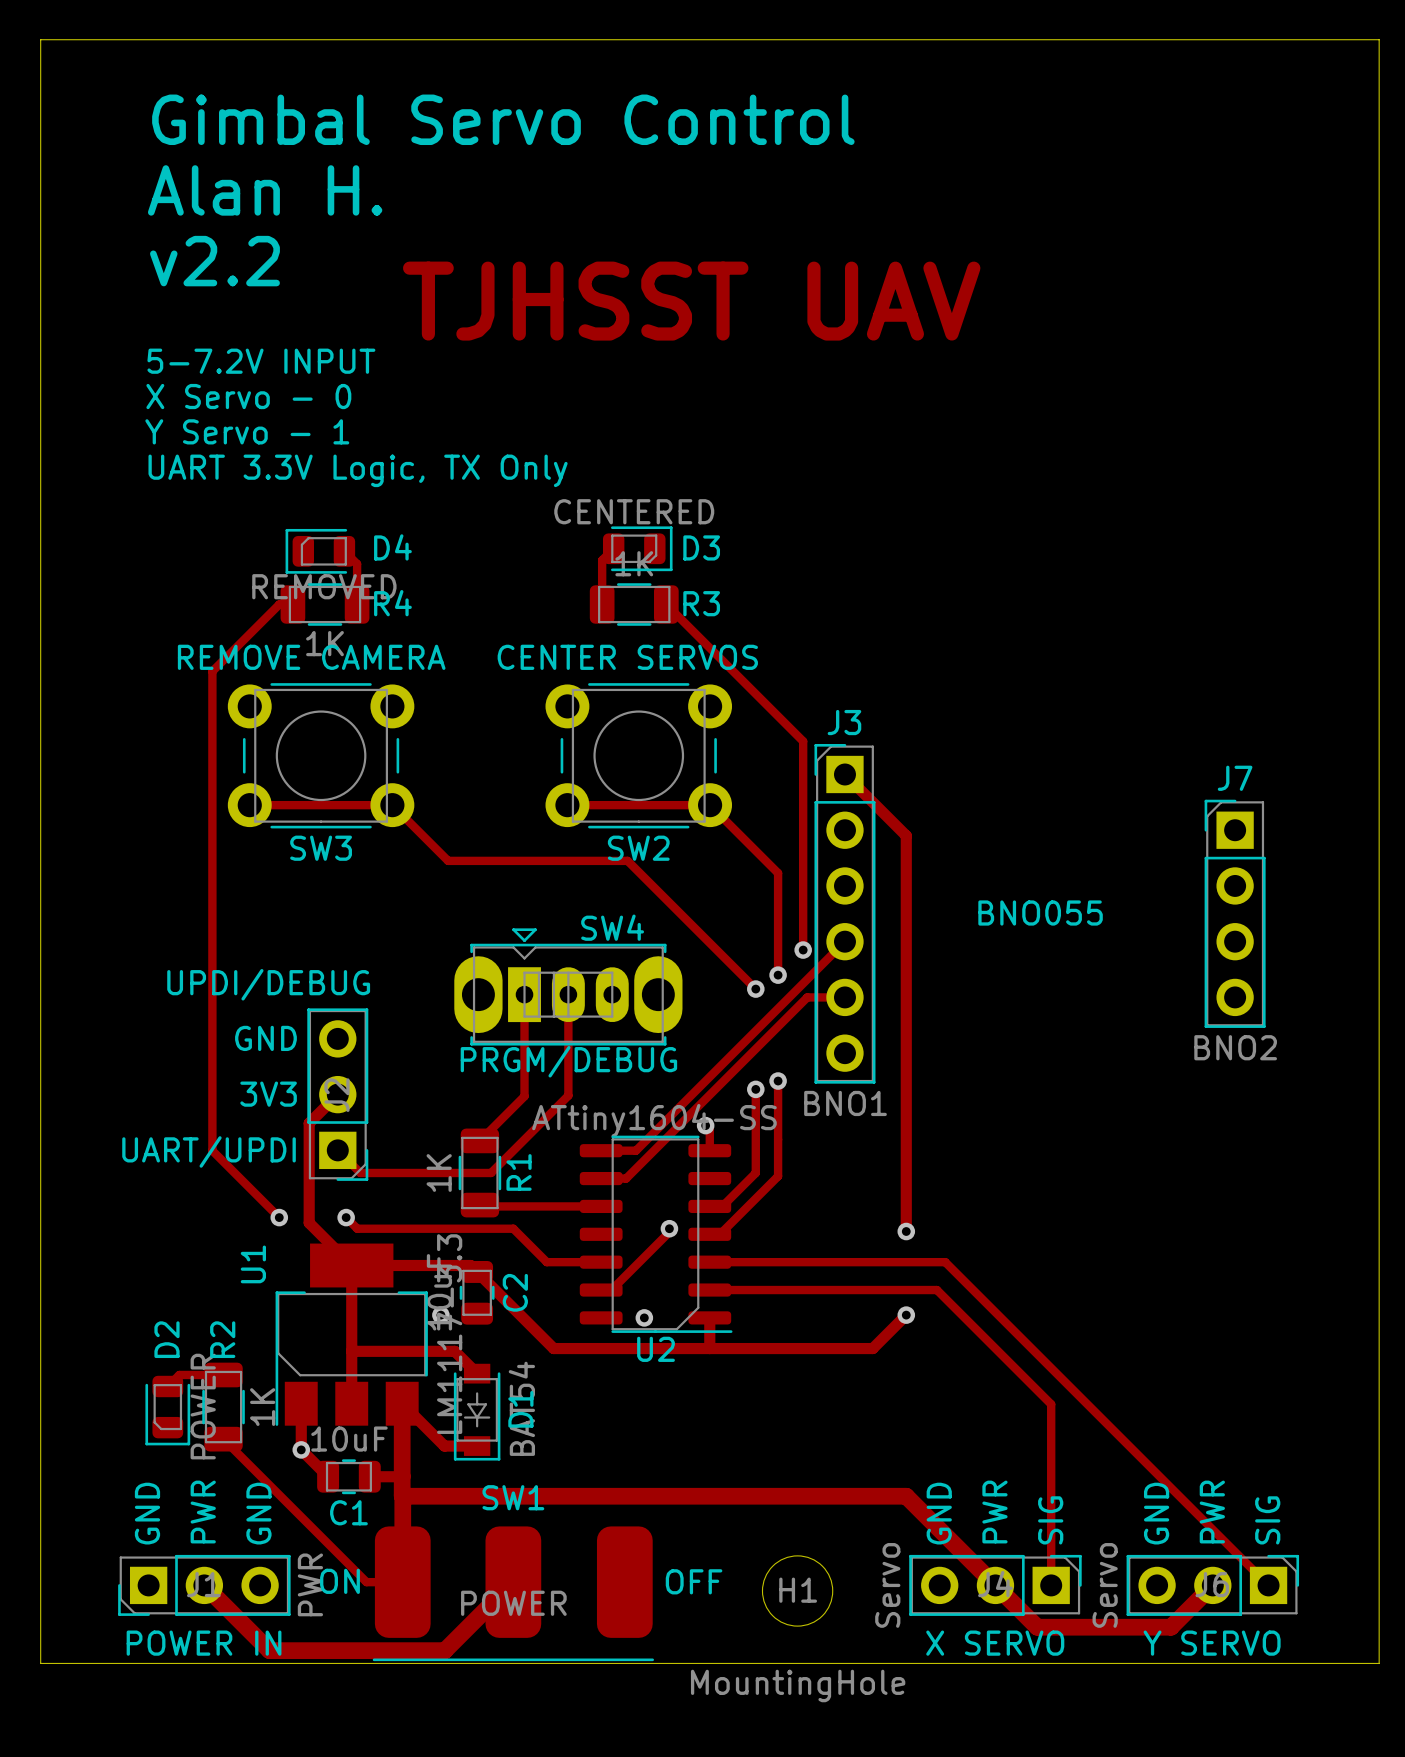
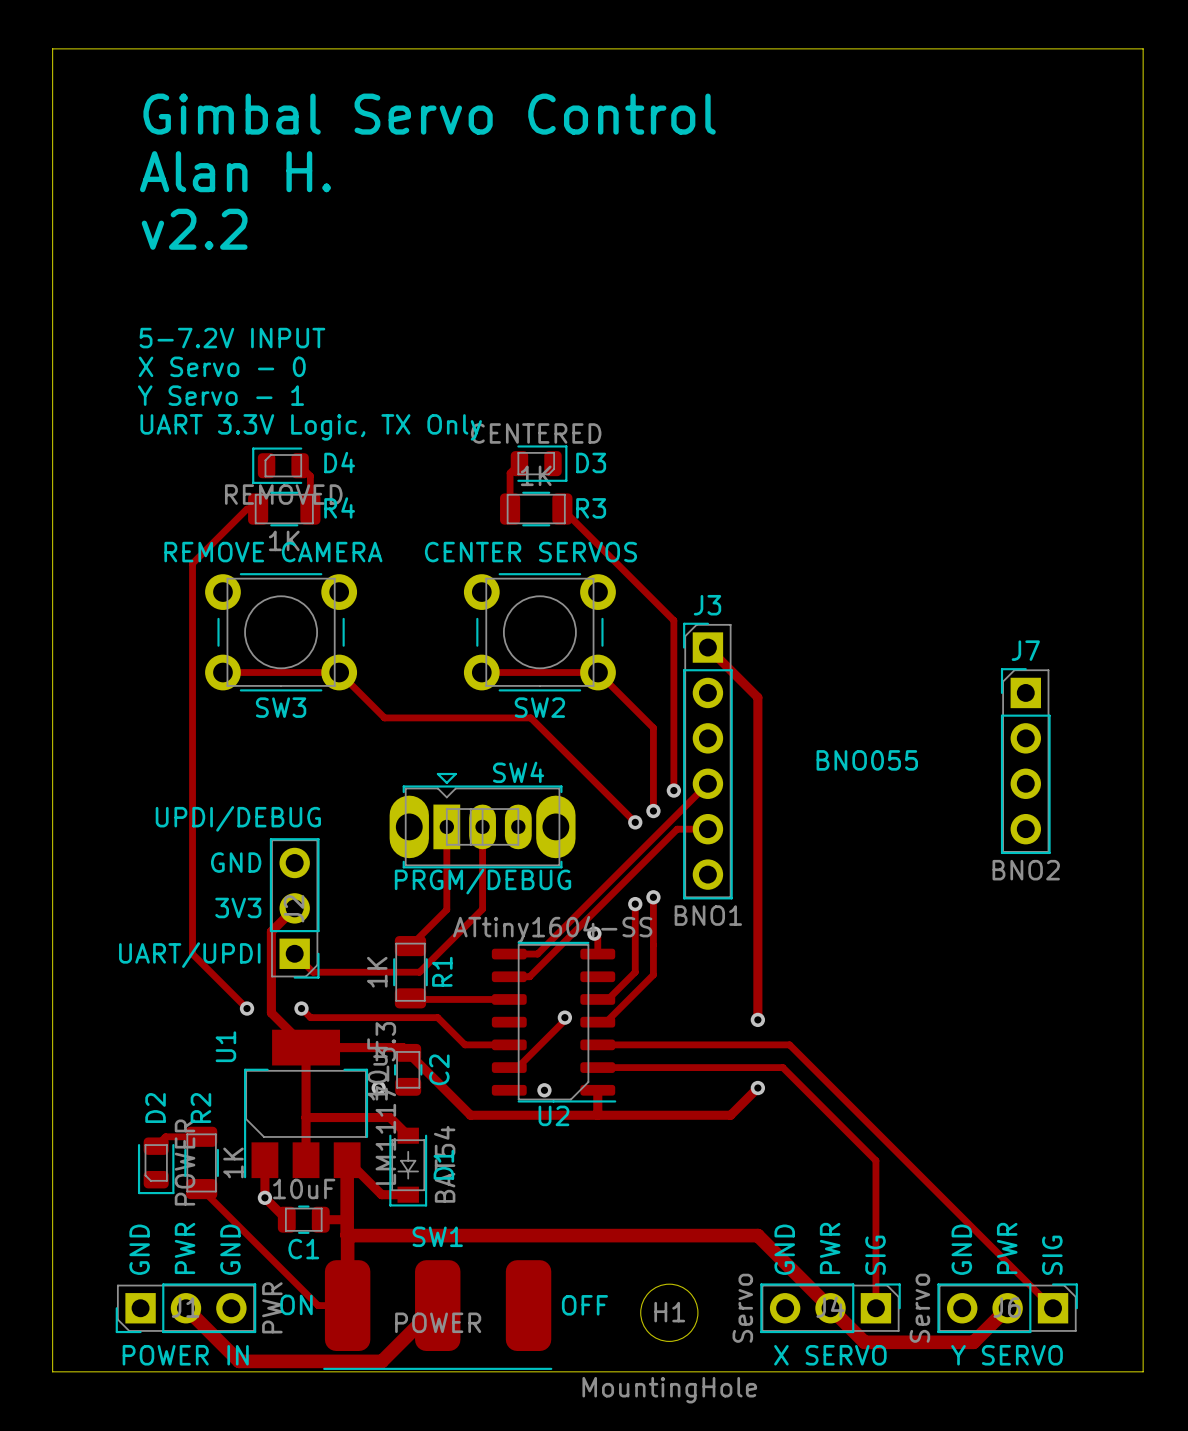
text: TJHSST UAV (691, 301) -> none
text: 5-7.2V INPUT (261, 361) -> none
text: X Servo - 0 (248, 396) -> 5-7.2V INPUT (232, 338)
text: Y Servo - 1 (247, 431) -> X Servo - 0 (222, 366)
text: UART 3.3V Logic, TX Only (358, 470) -> Y Servo - 1 (220, 395)
text: none -> UART 3.3V Logic, TX Only (311, 427)

